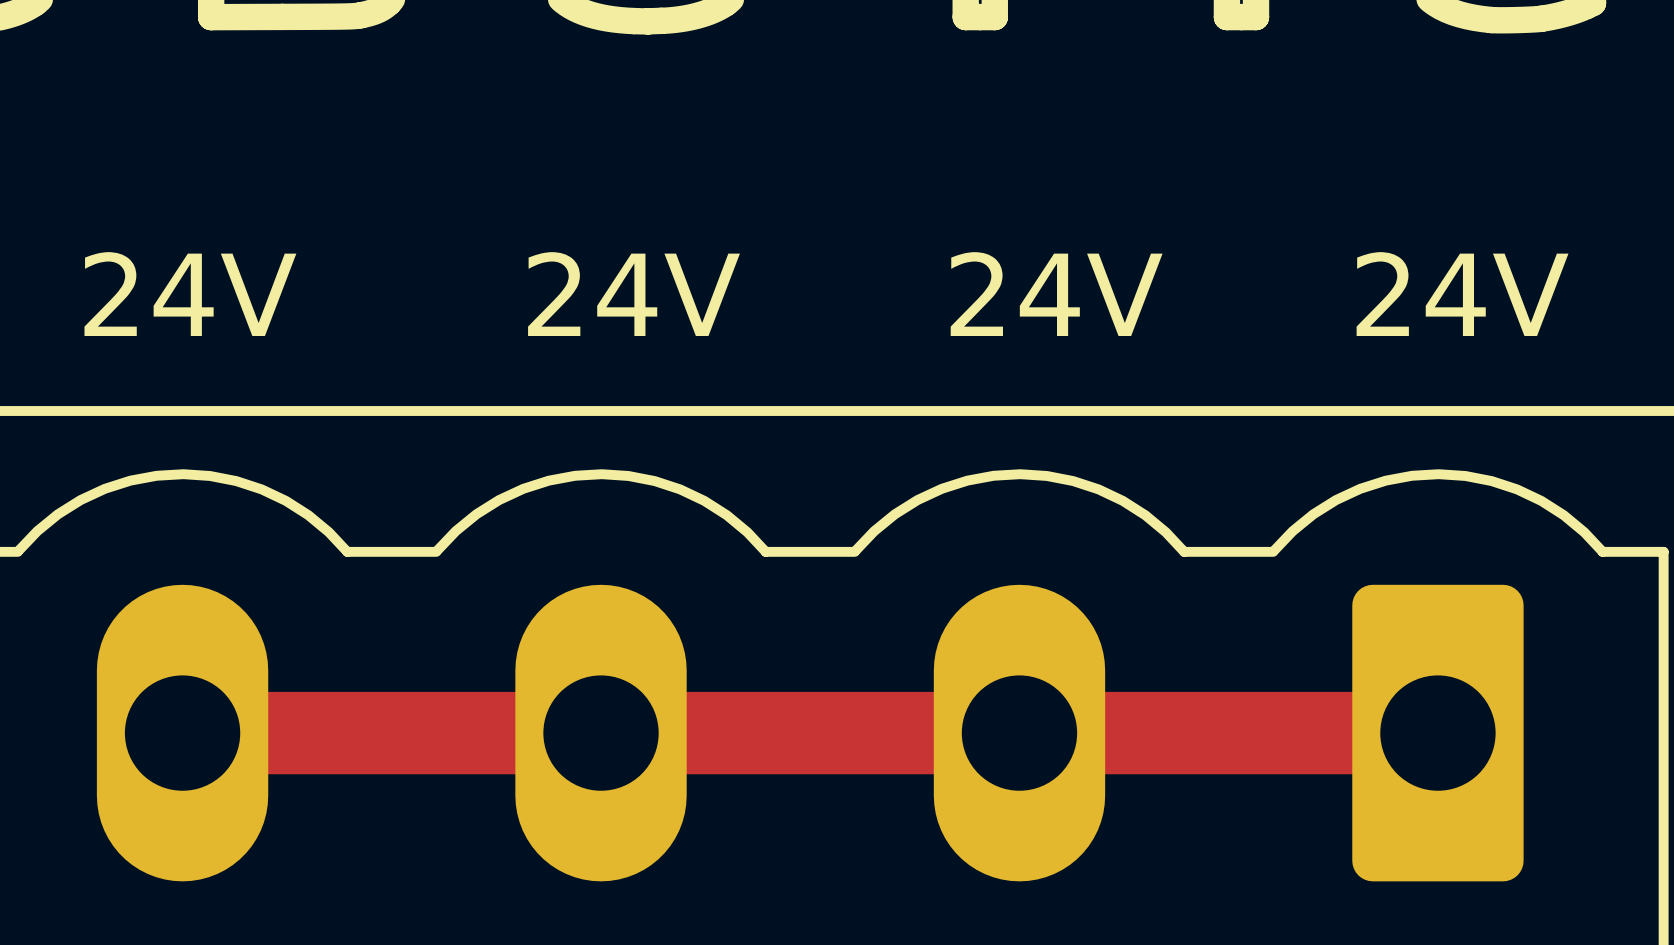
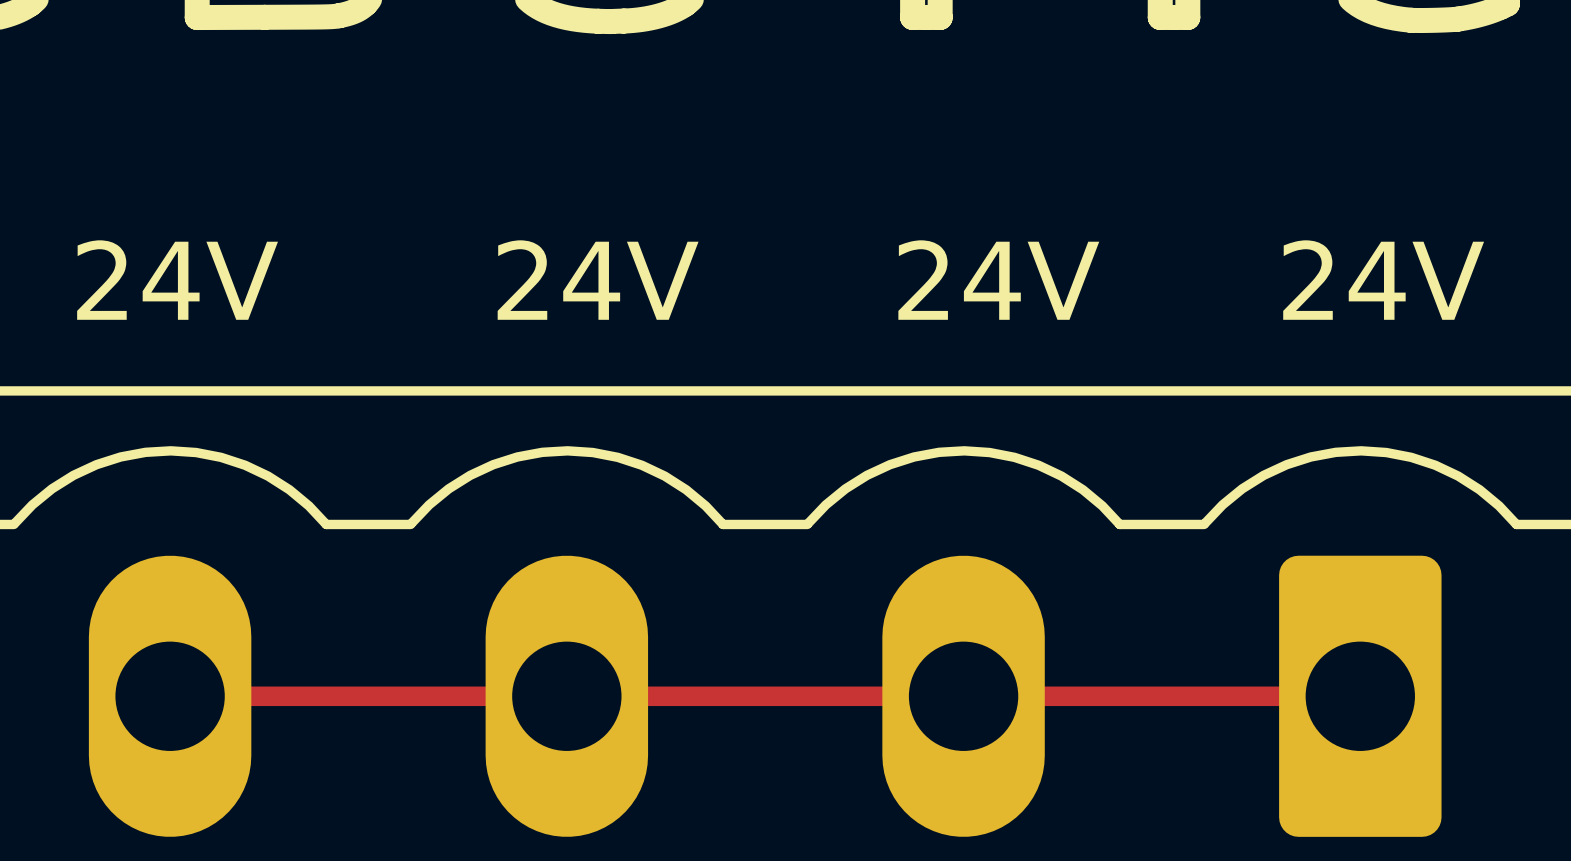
track width: thick (182, 733) (1437, 733) -> thin (170, 696) (1360, 696)

